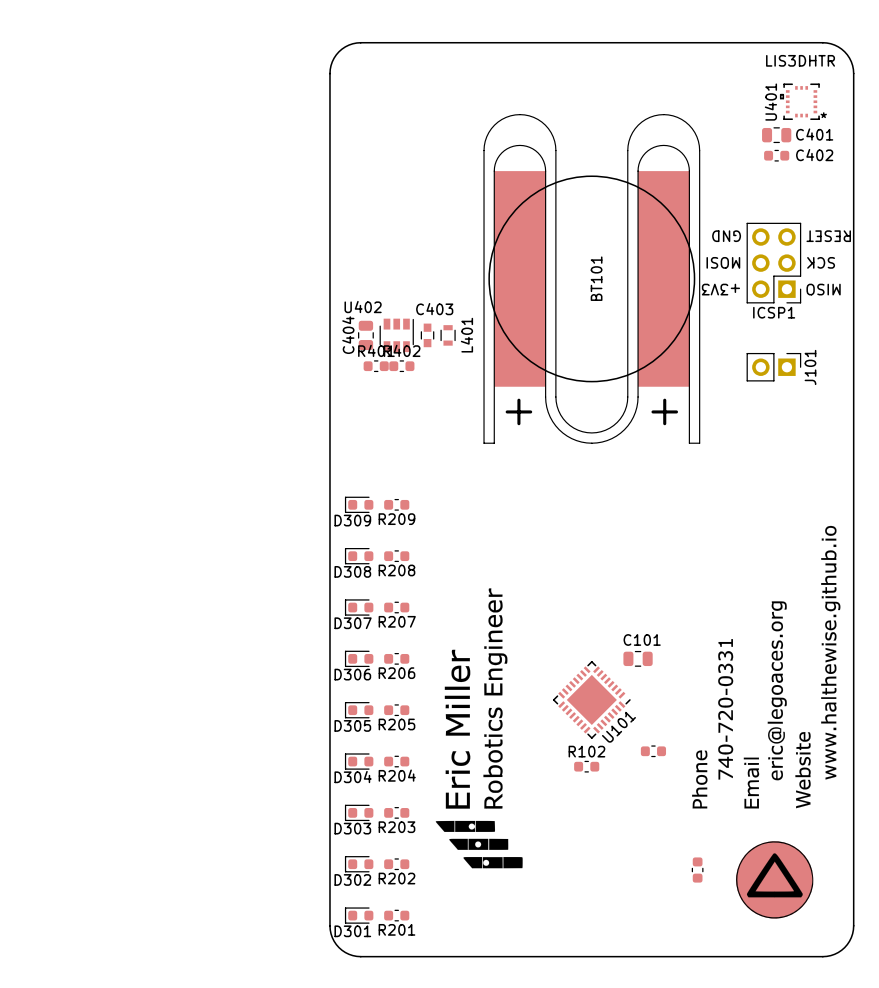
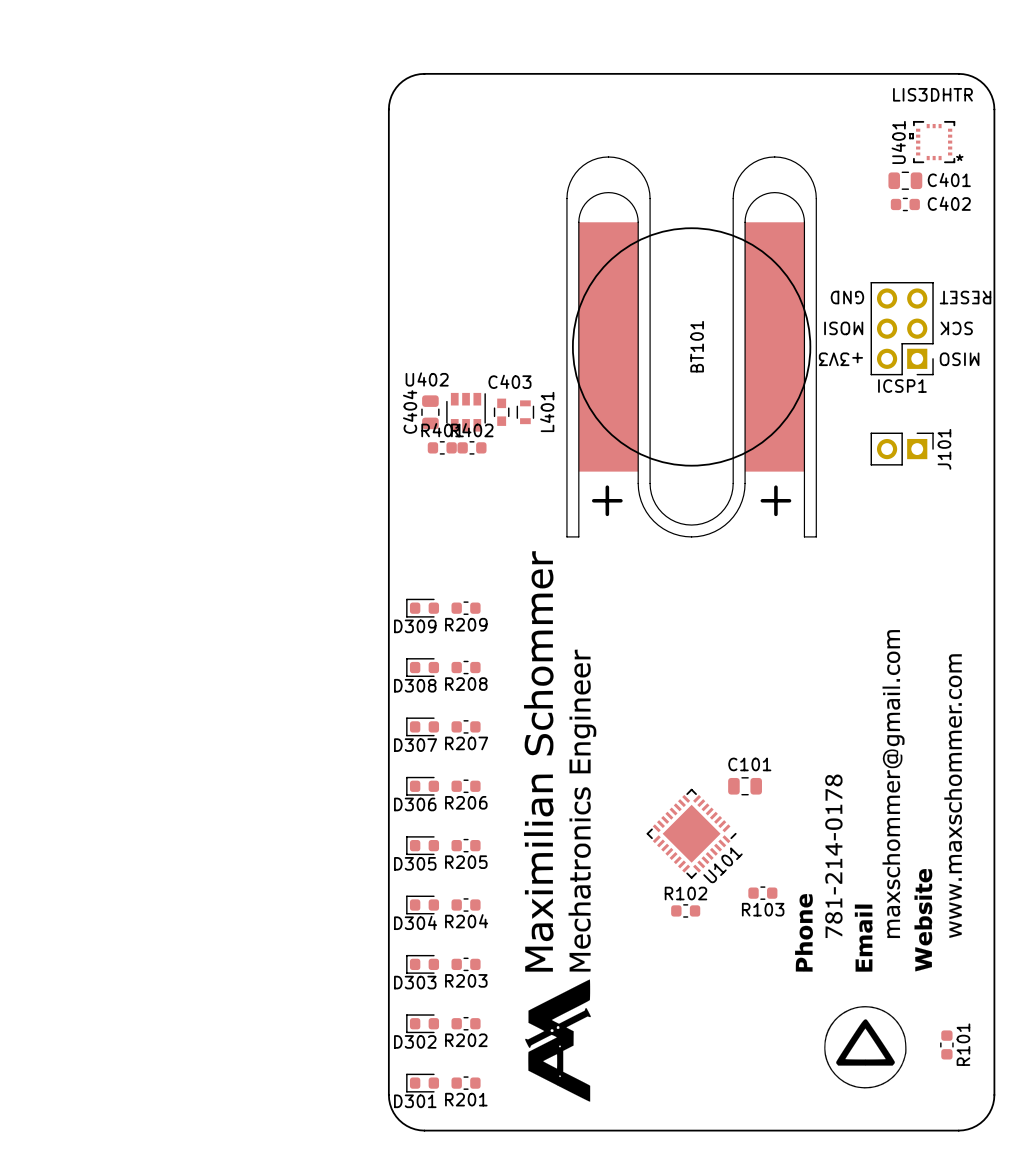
drawing shape: [435, 525, 841, 869] -> [523, 551, 963, 1102]
R103 name: none -> R103 (763, 909)
drawing: [736, 841, 814, 919] -> none
drawing: none -> [824, 1006, 907, 1089]
part: (697, 870) -> none
part: (774, 879) -> none
R101: none -> (946, 1044)

